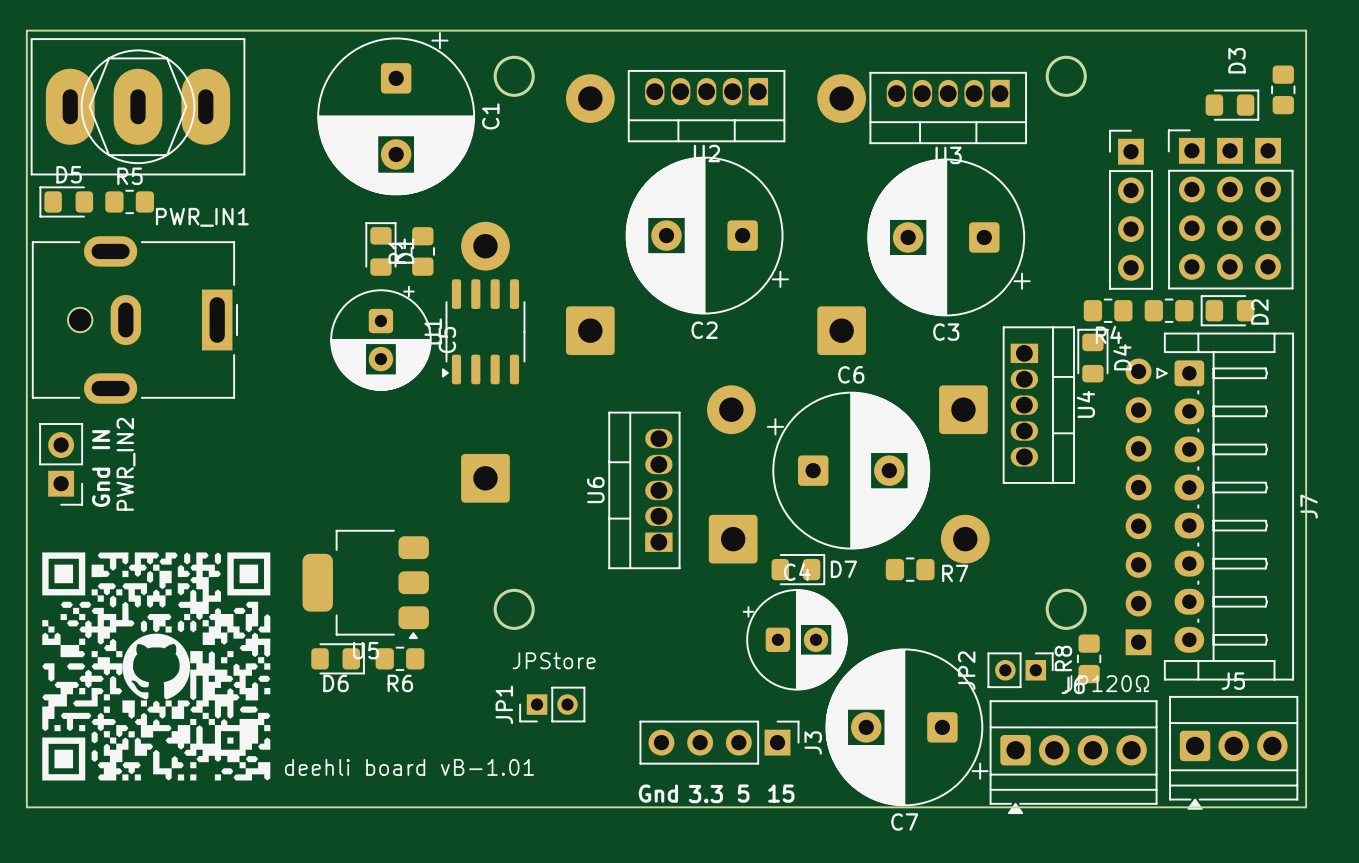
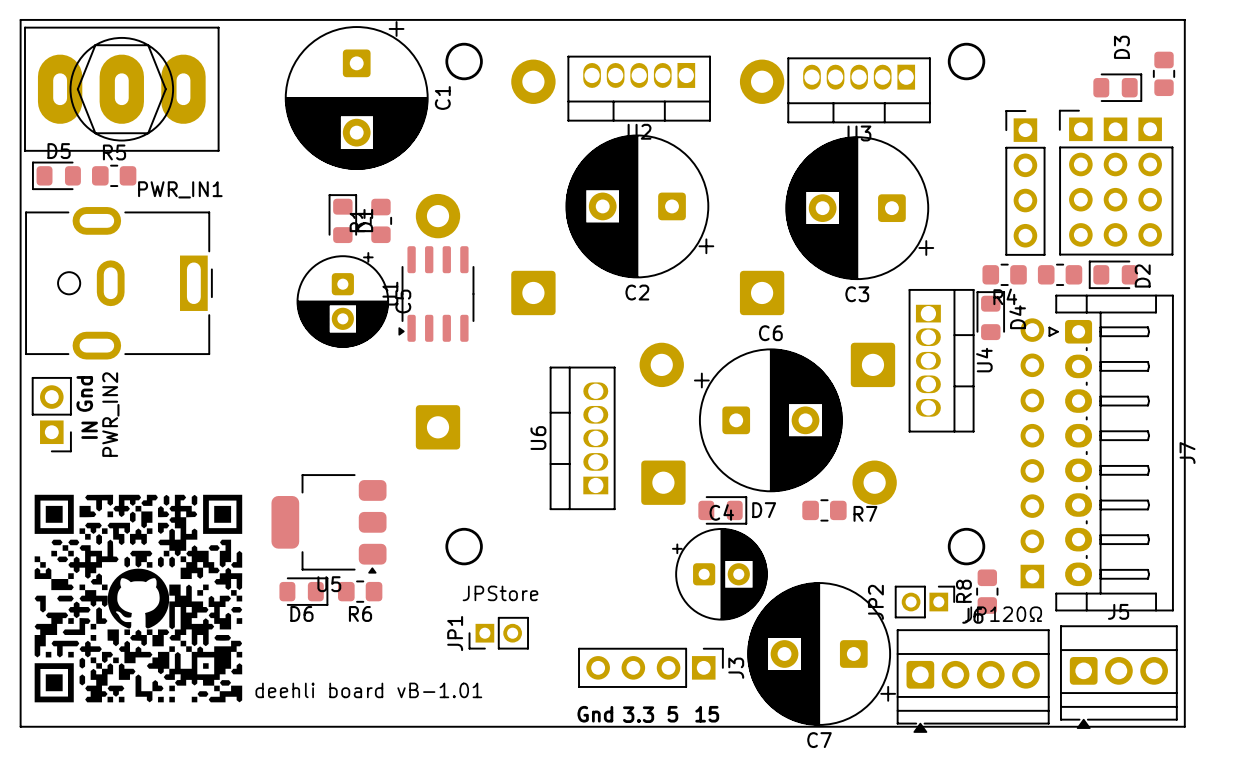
text position: IN (101, 439) -> IN (89, 430)
text position: Gnd (101, 487) -> Gnd (84, 393)

